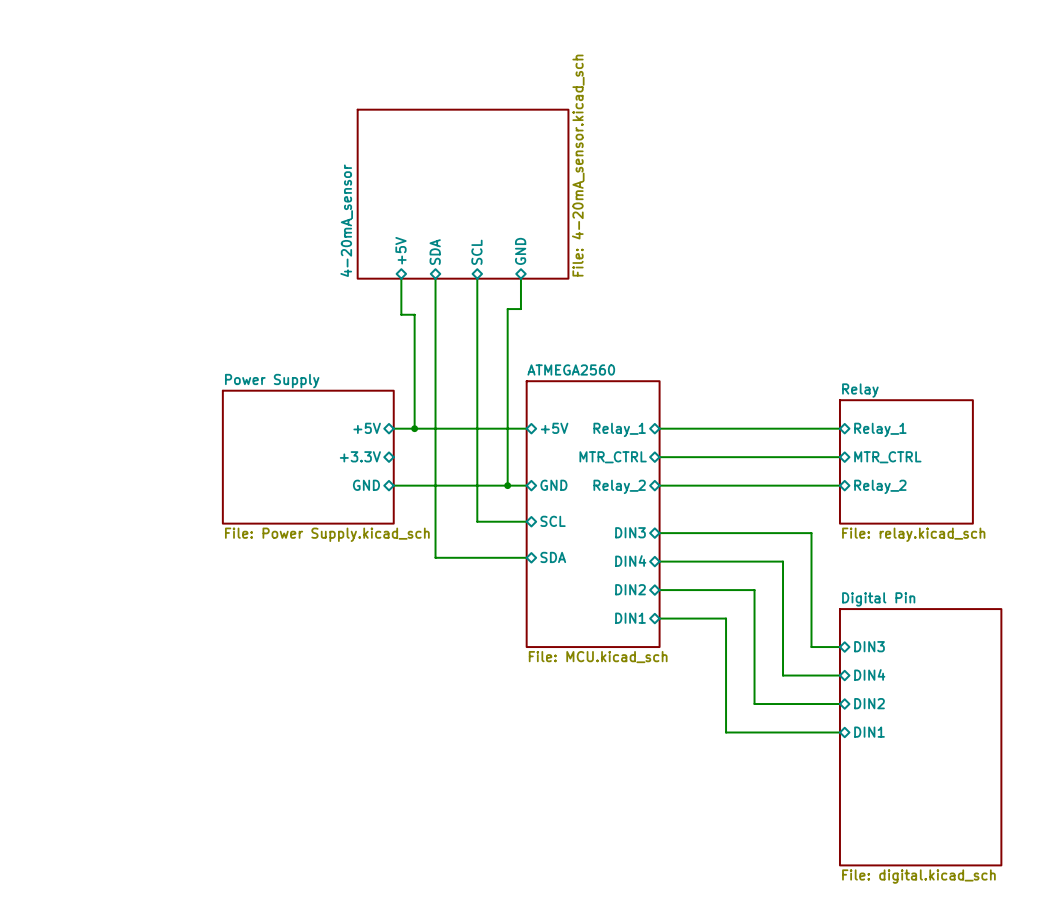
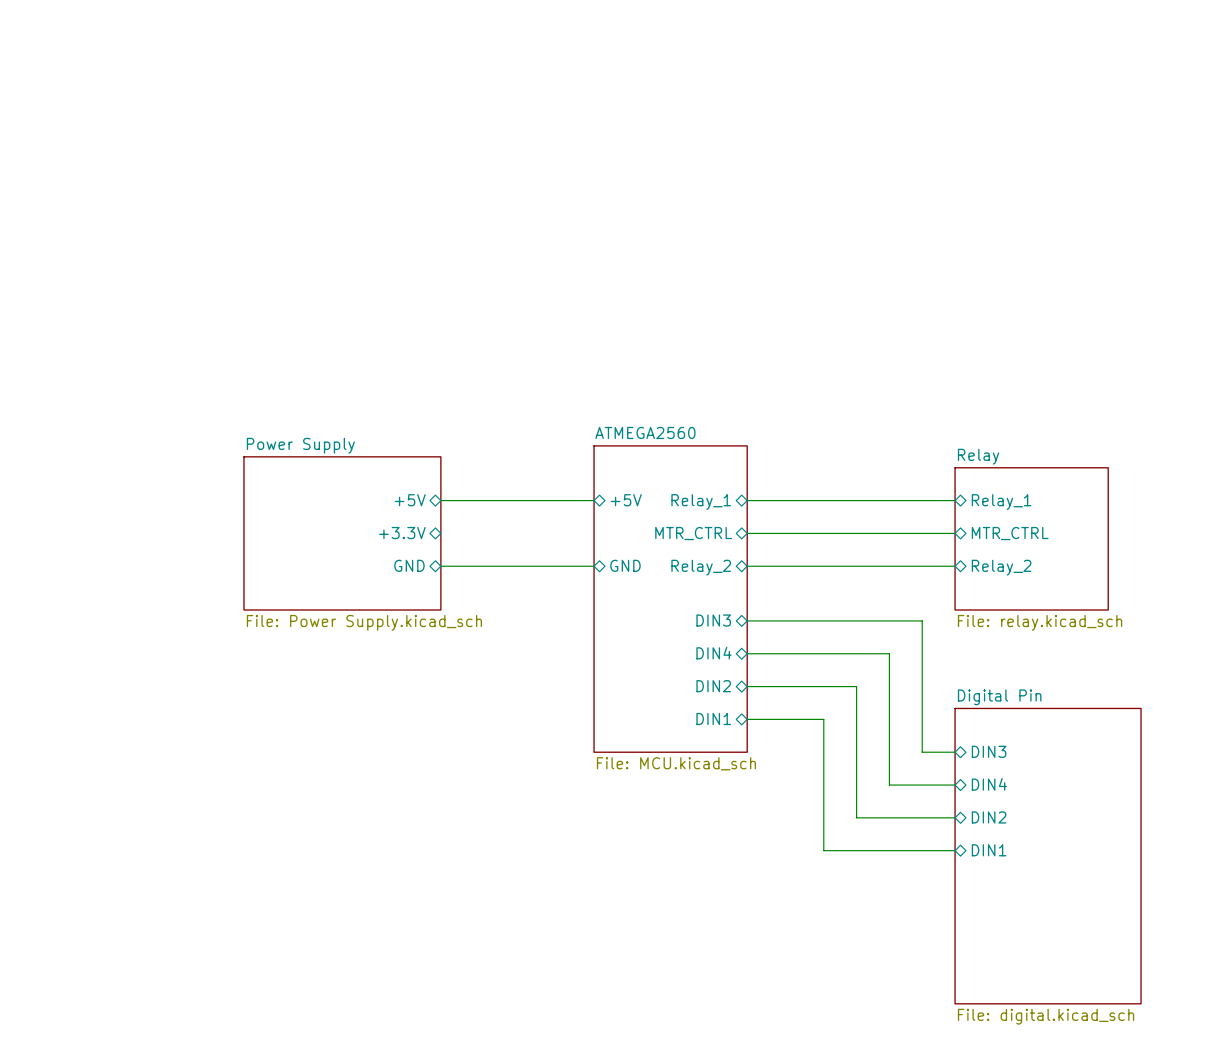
sheet 4-20mA_sensor: File: 4-20mA_sensor.kicad_sch (463, 194) -> none
sheet pin: +5V (400, 250) -> none
sheet pin: GND (520, 251) -> none
sheet pin: SDA (435, 252) -> none
sheet pin: SCL (476, 252) -> none
wire: (401, 278) (401, 314) (414, 314) (414, 428) -> none
wire: (435, 278) (435, 557) (526, 557) -> none
wire: (477, 278) (477, 521) (526, 521) -> none
wire: (520, 278) (520, 309) (507, 309) (507, 485) -> none
junction: (414, 428) -> none
junction: (507, 485) -> none
sheet pin: SCL (553, 521) -> none
sheet pin: SDA (553, 557) -> none

